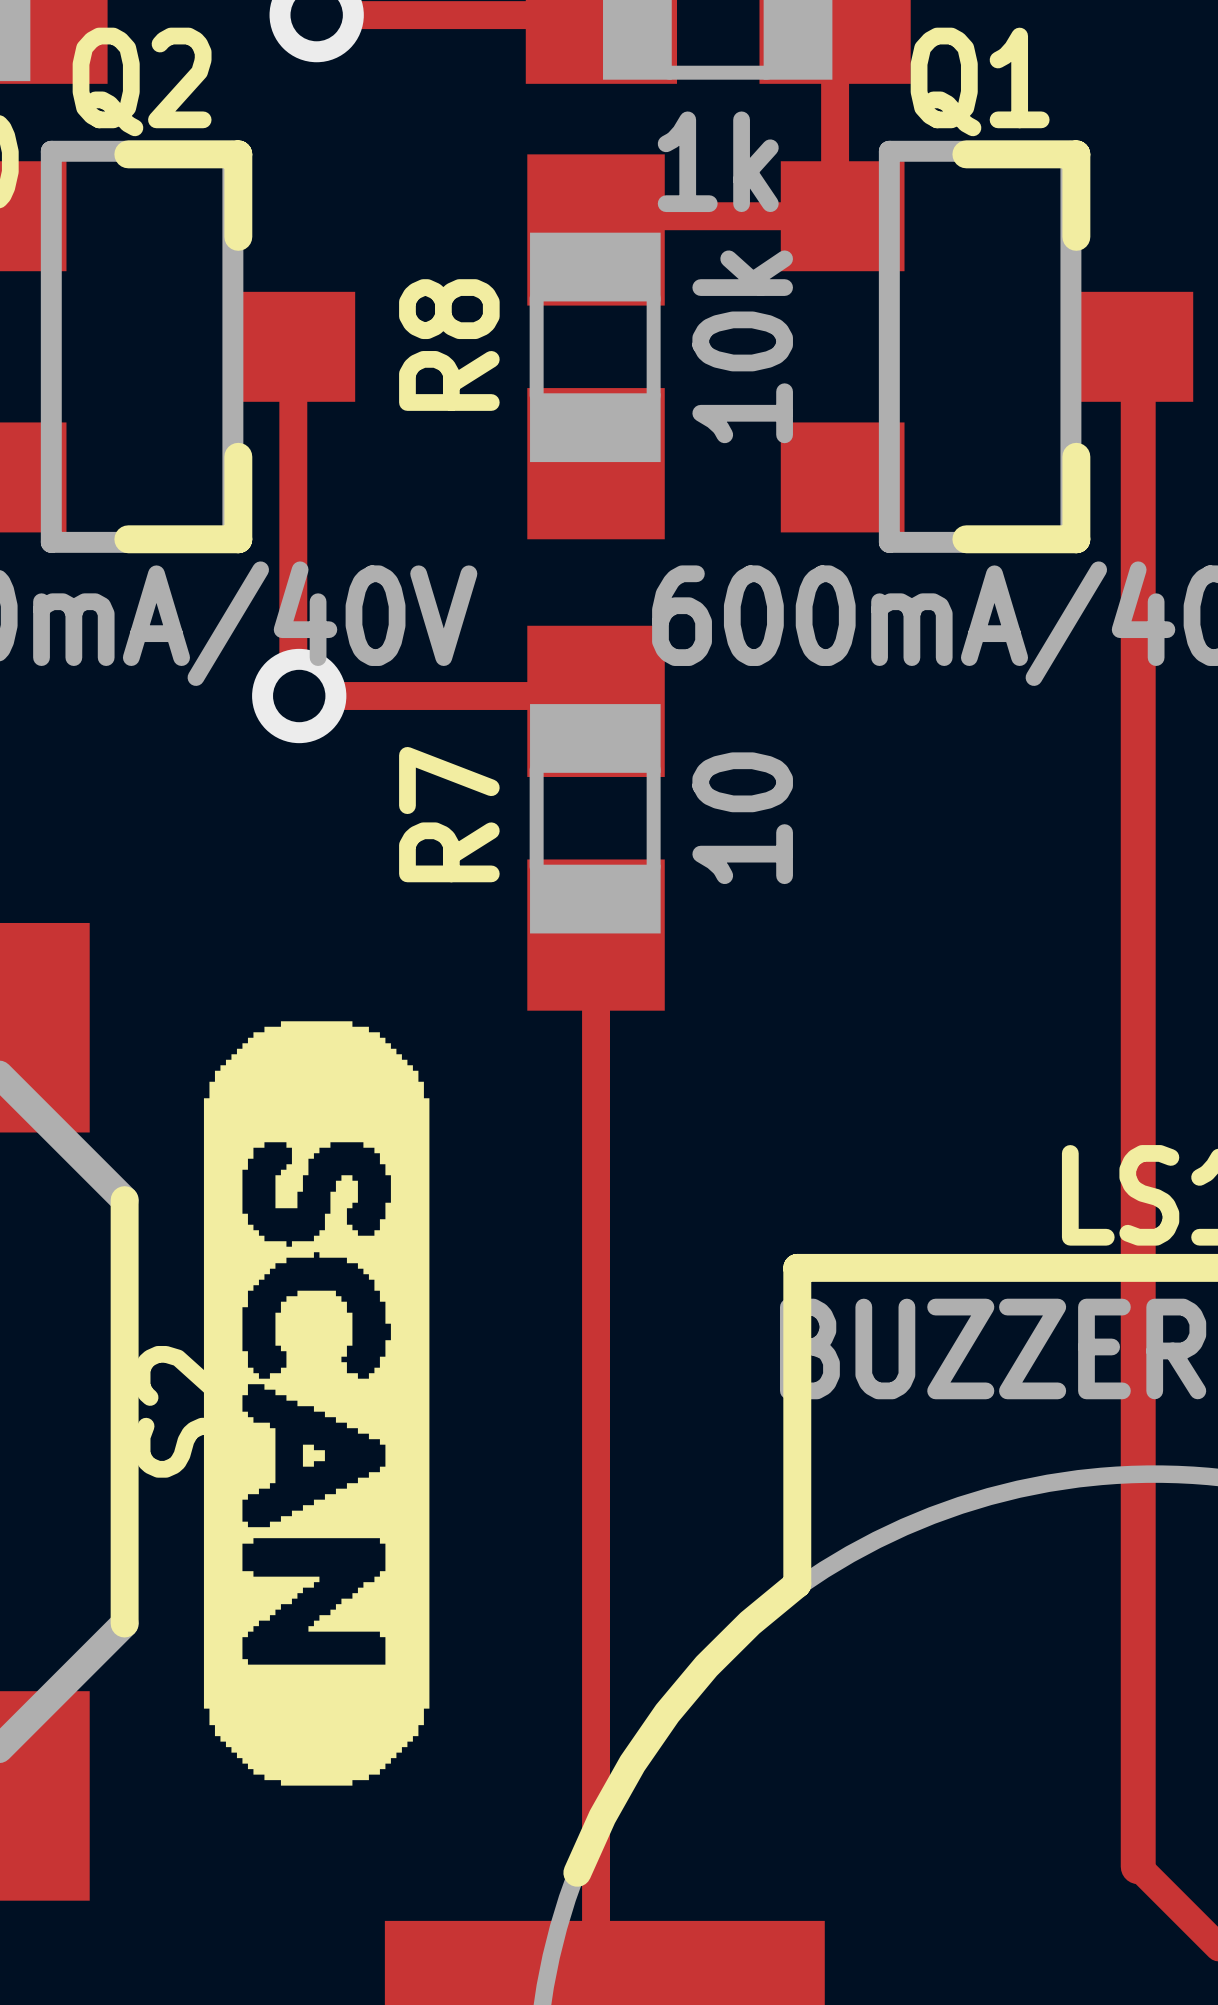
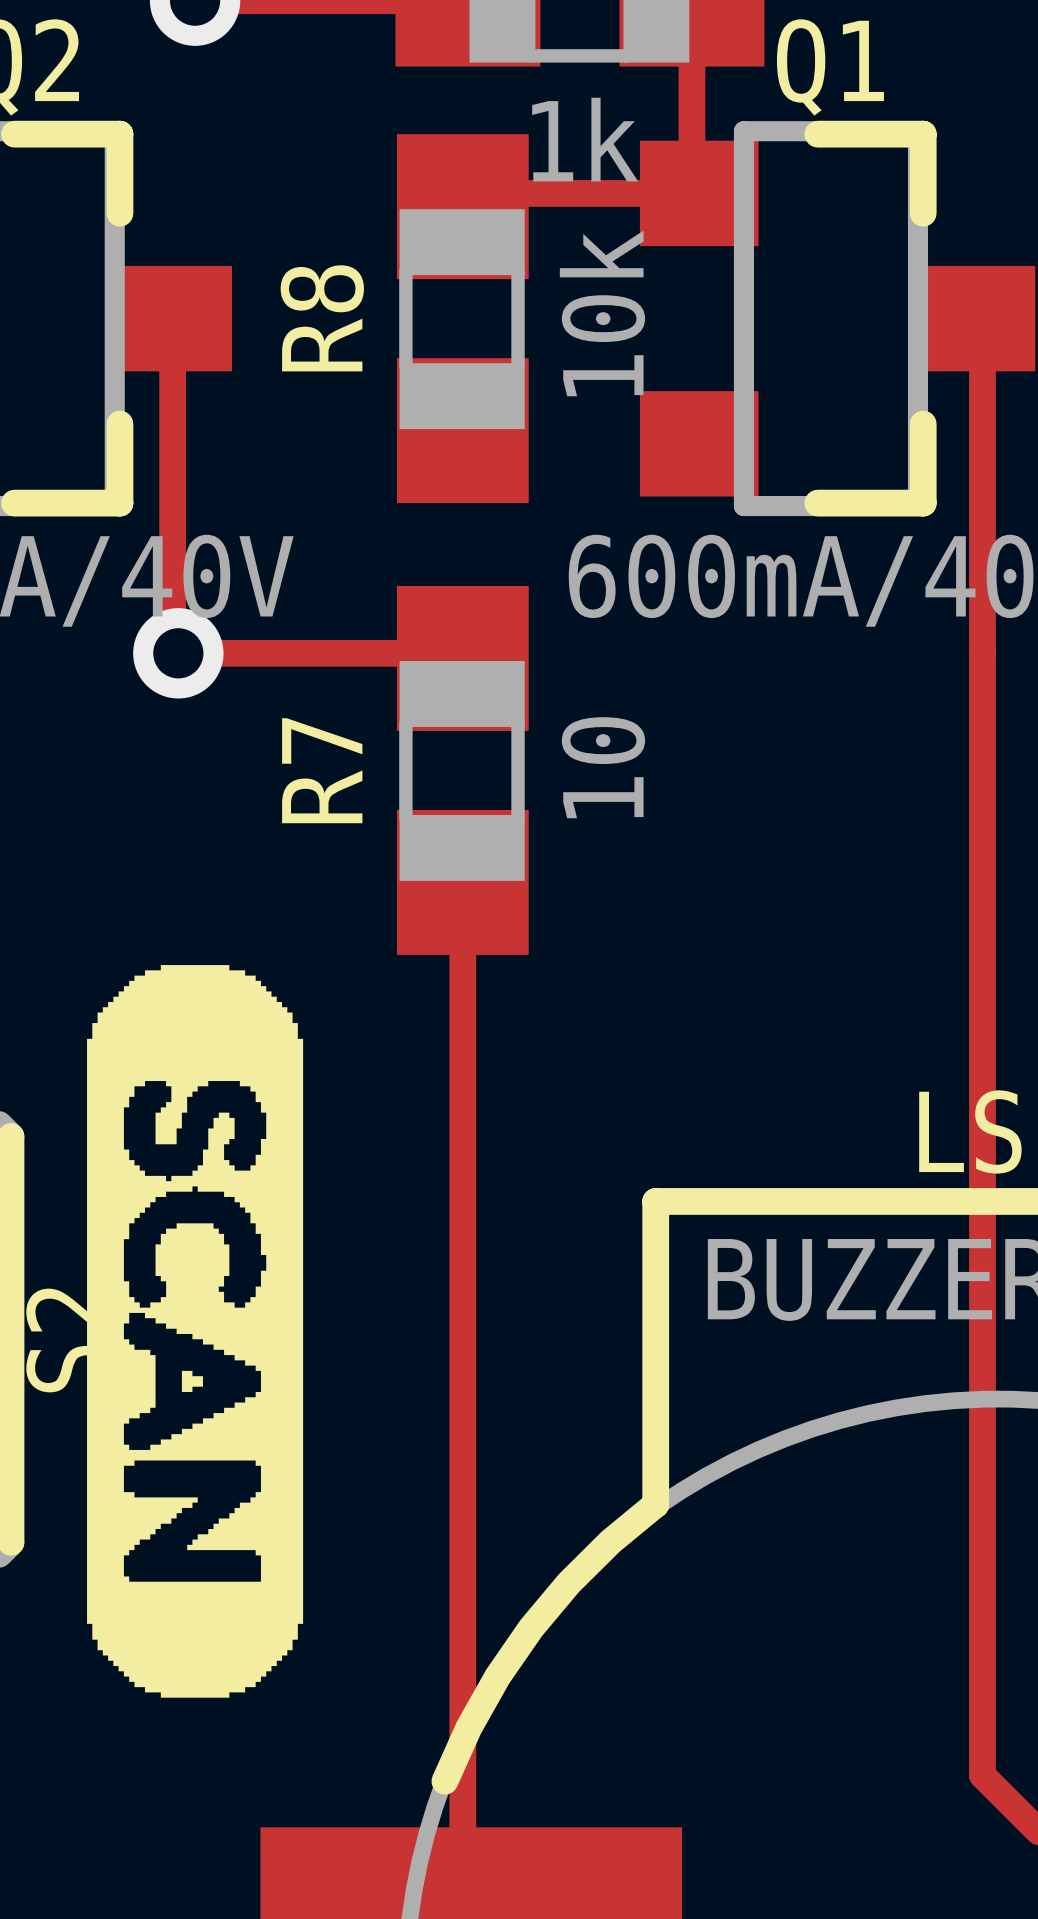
track width: thick (1138, 353) (1138, 1866) -> thin (982, 325) (982, 1775)

